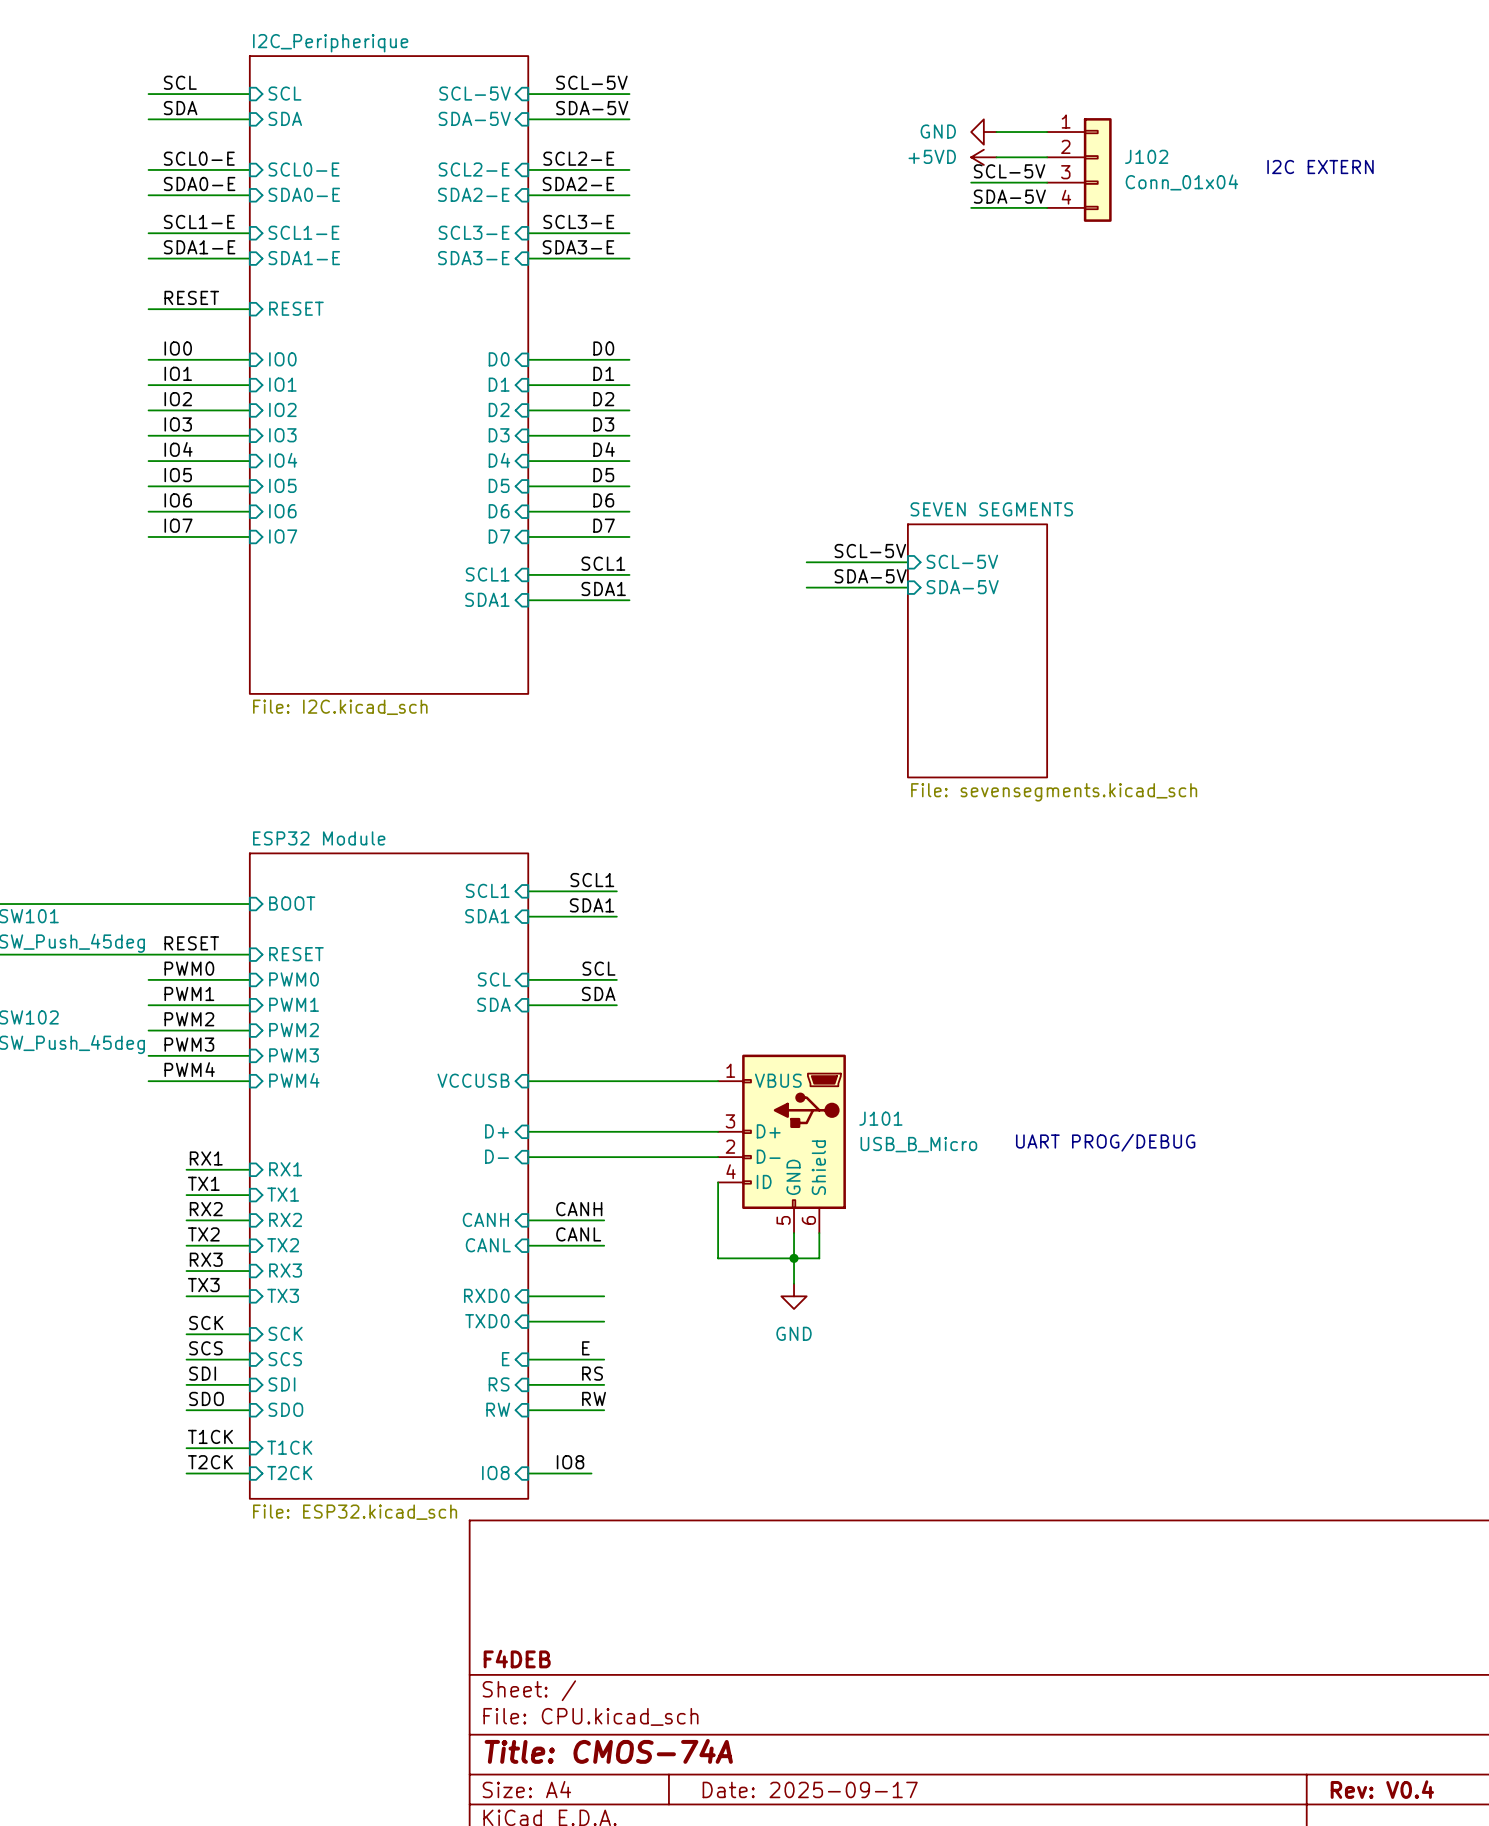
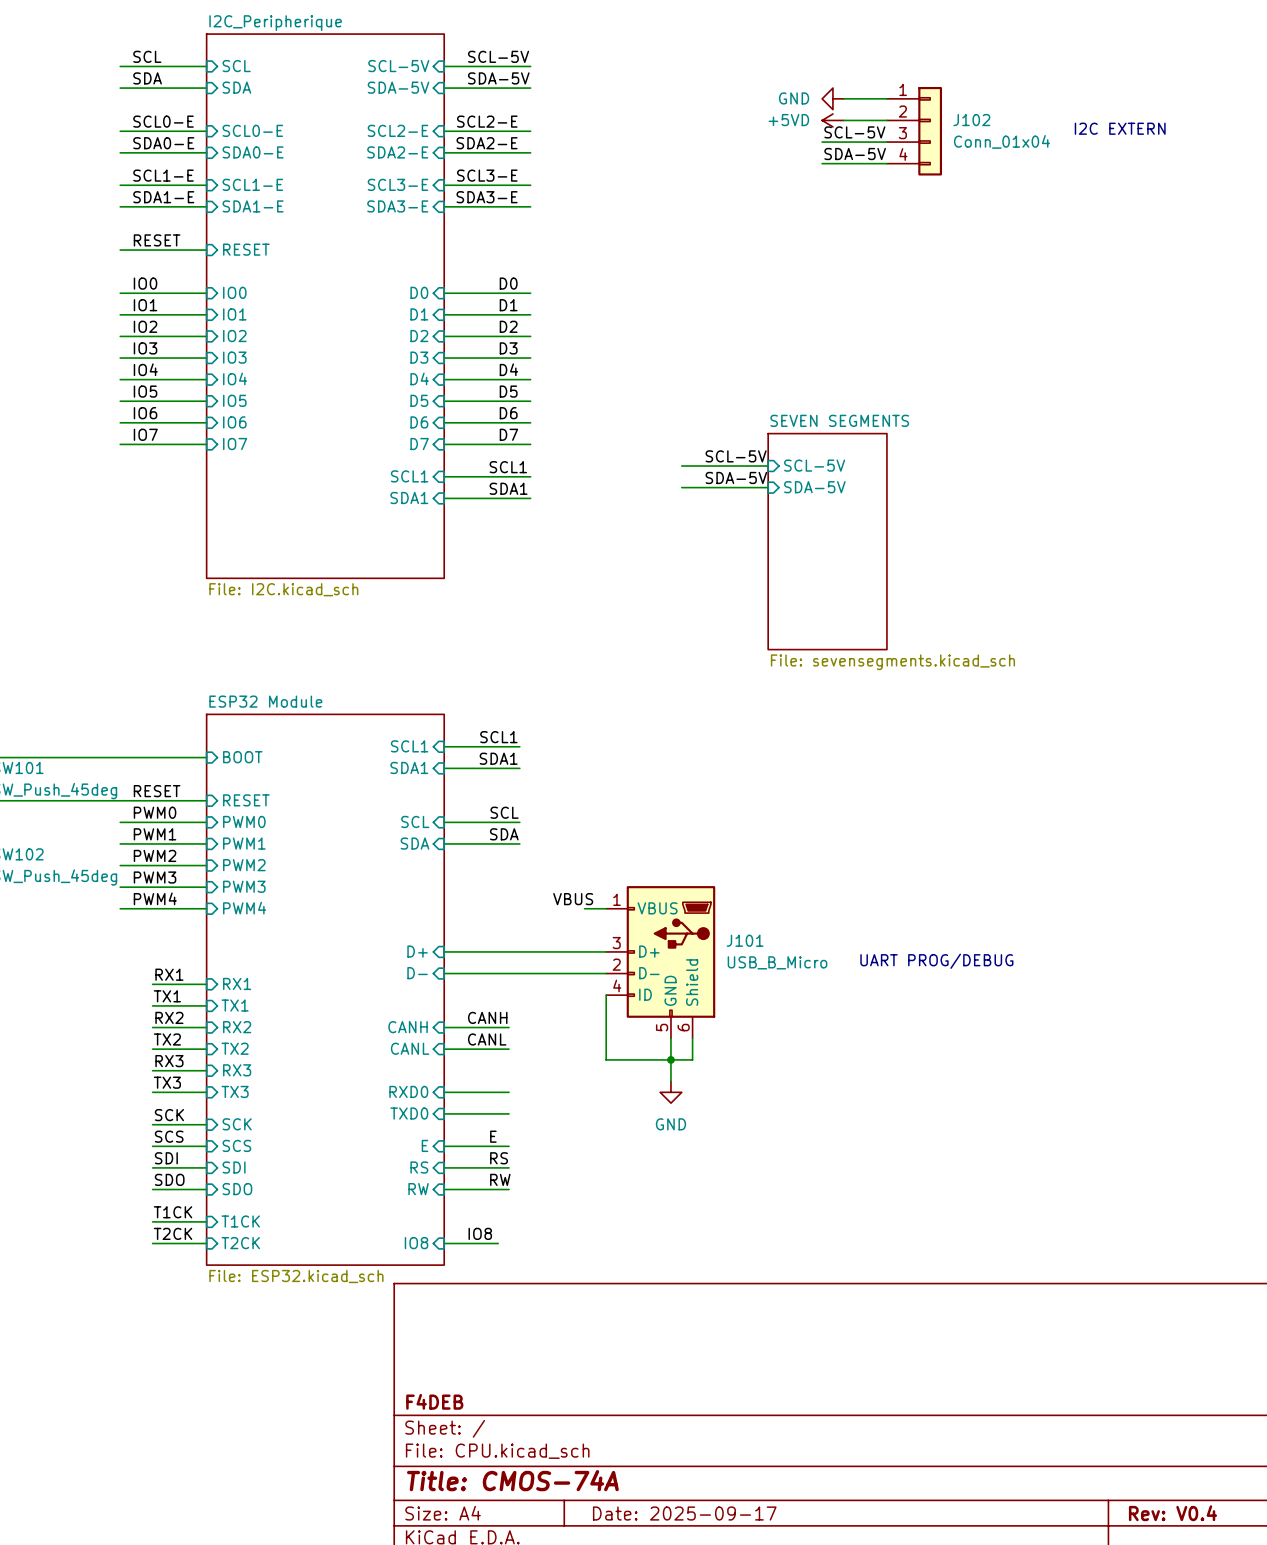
label: none -> VBUS (573, 899)
sheet pin: VCCUSB (473, 1080) -> none
wire: (528, 1081) (692, 1081) -> none

